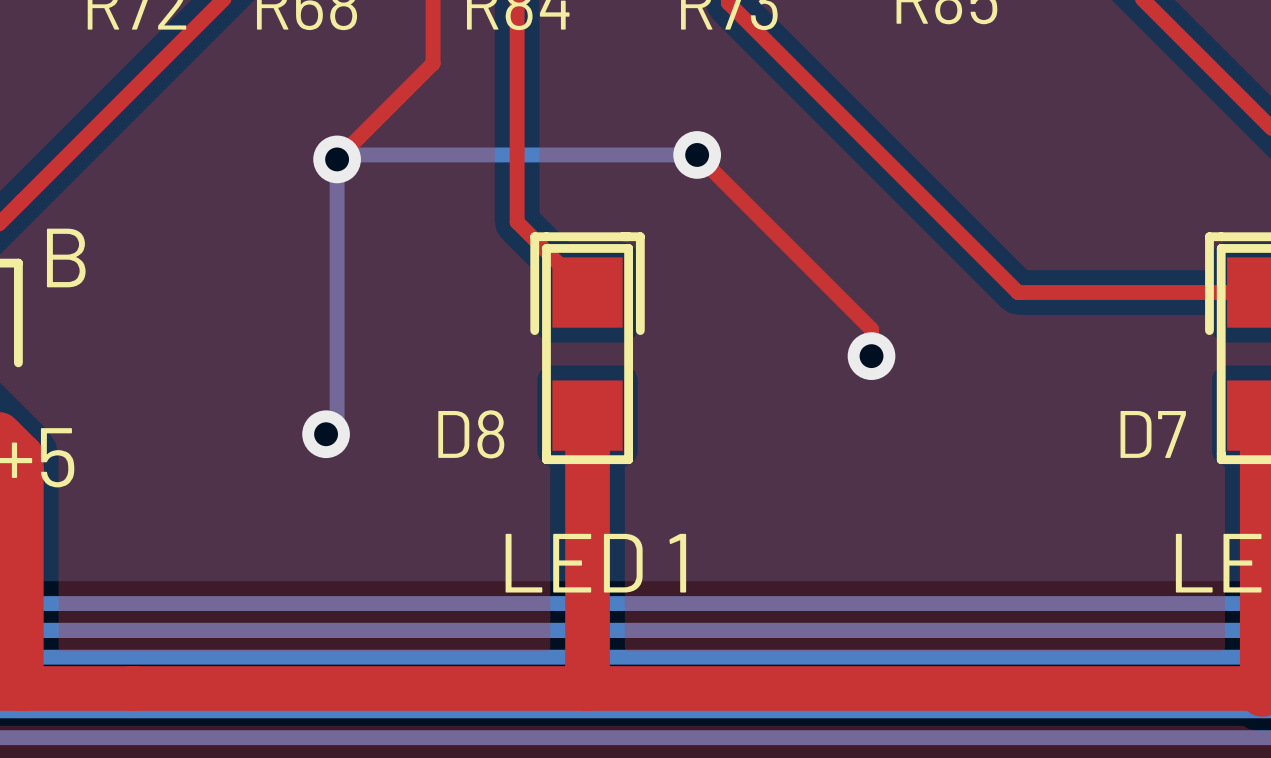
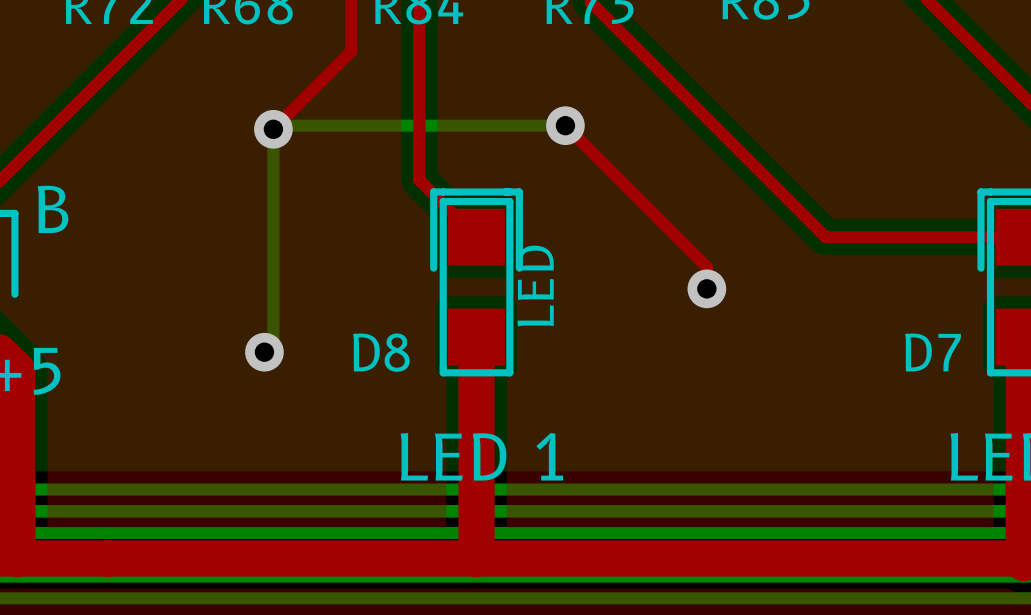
D8 value: none -> LED (535, 285)

